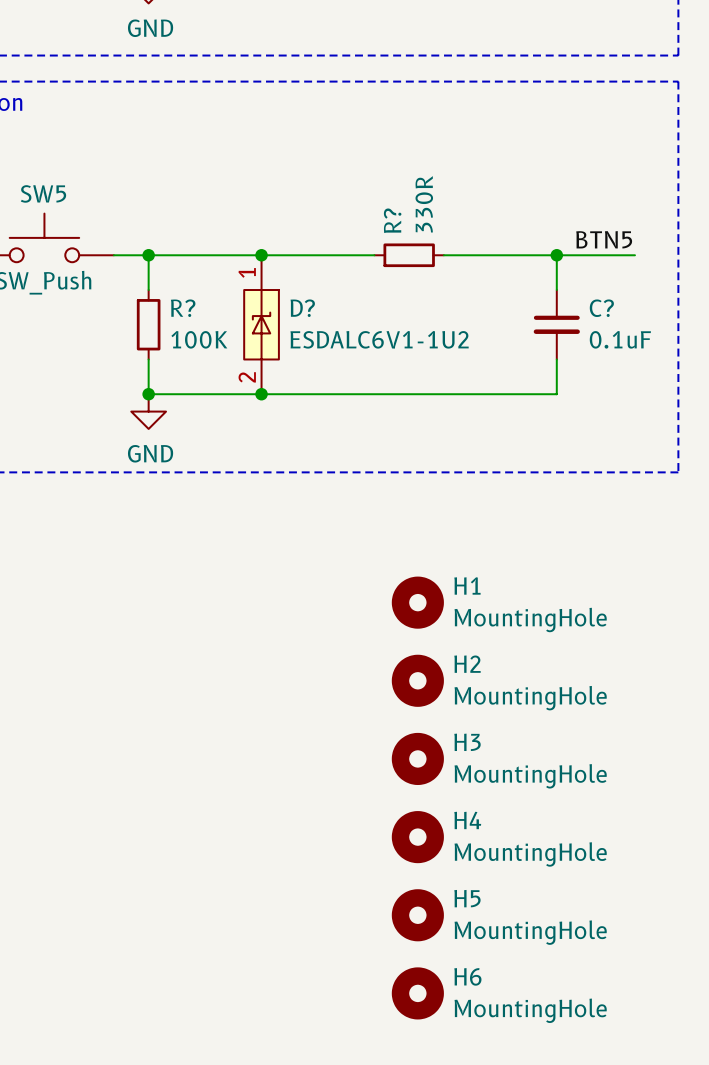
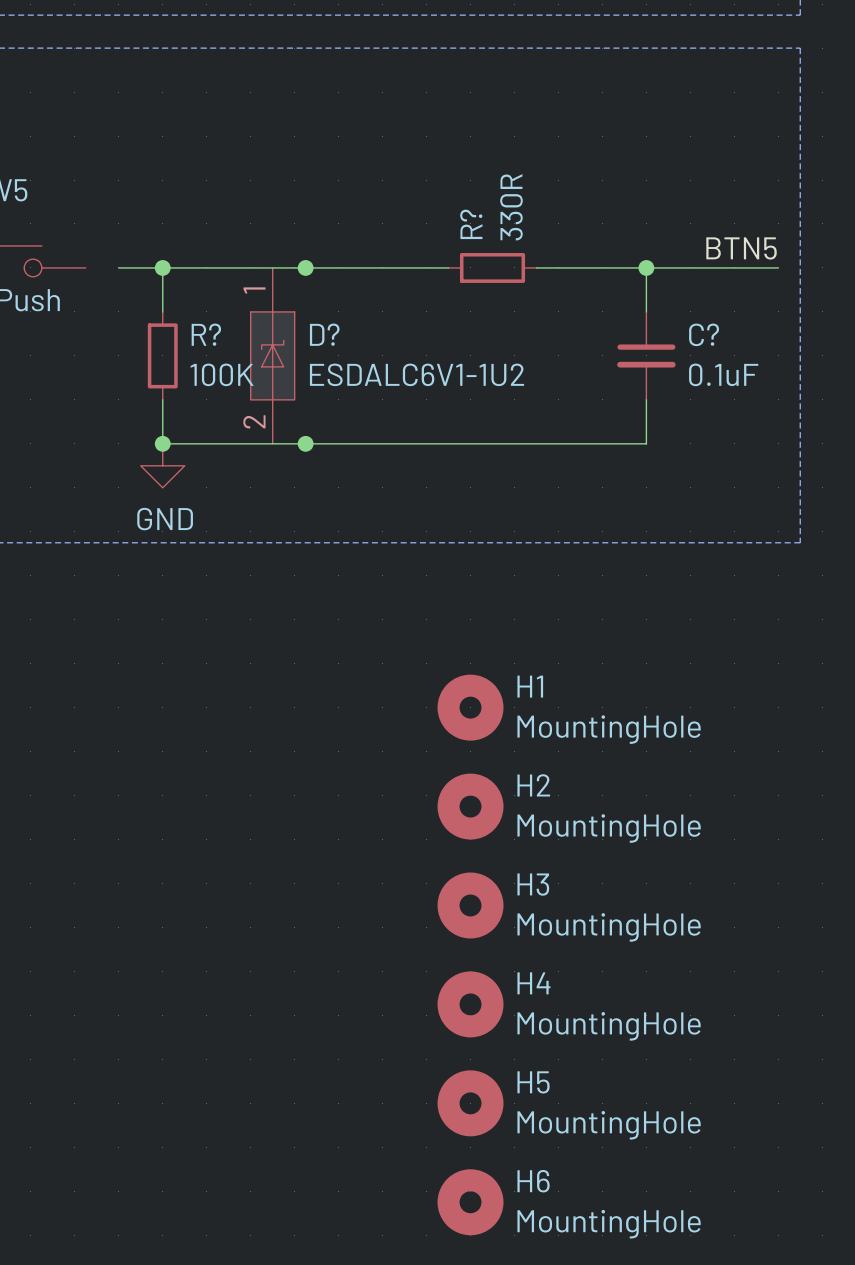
label position: BTN5 (604, 239) -> BTN5 (741, 248)
wire: (113, 255) (139, 255) -> none
wire: (148, 255) (148, 290) -> (162, 267) (162, 311)
junction position: (148, 255) -> (162, 267)
junction position: (261, 255) -> (305, 267)
R? position: (409, 255) -> (492, 267)
wire: (443, 255) (469, 255) -> (415, 267) (448, 267)
wire: none -> (745, 267) (778, 267)
R? position: (148, 324) -> (162, 355)
wire: (148, 359) (148, 394) (174, 394) -> (162, 399) (162, 443)
junction position: (148, 394) -> (162, 443)
junction position: (261, 394) -> (305, 443)
power symbol position: GND (148, 411) -> GND (162, 465)

